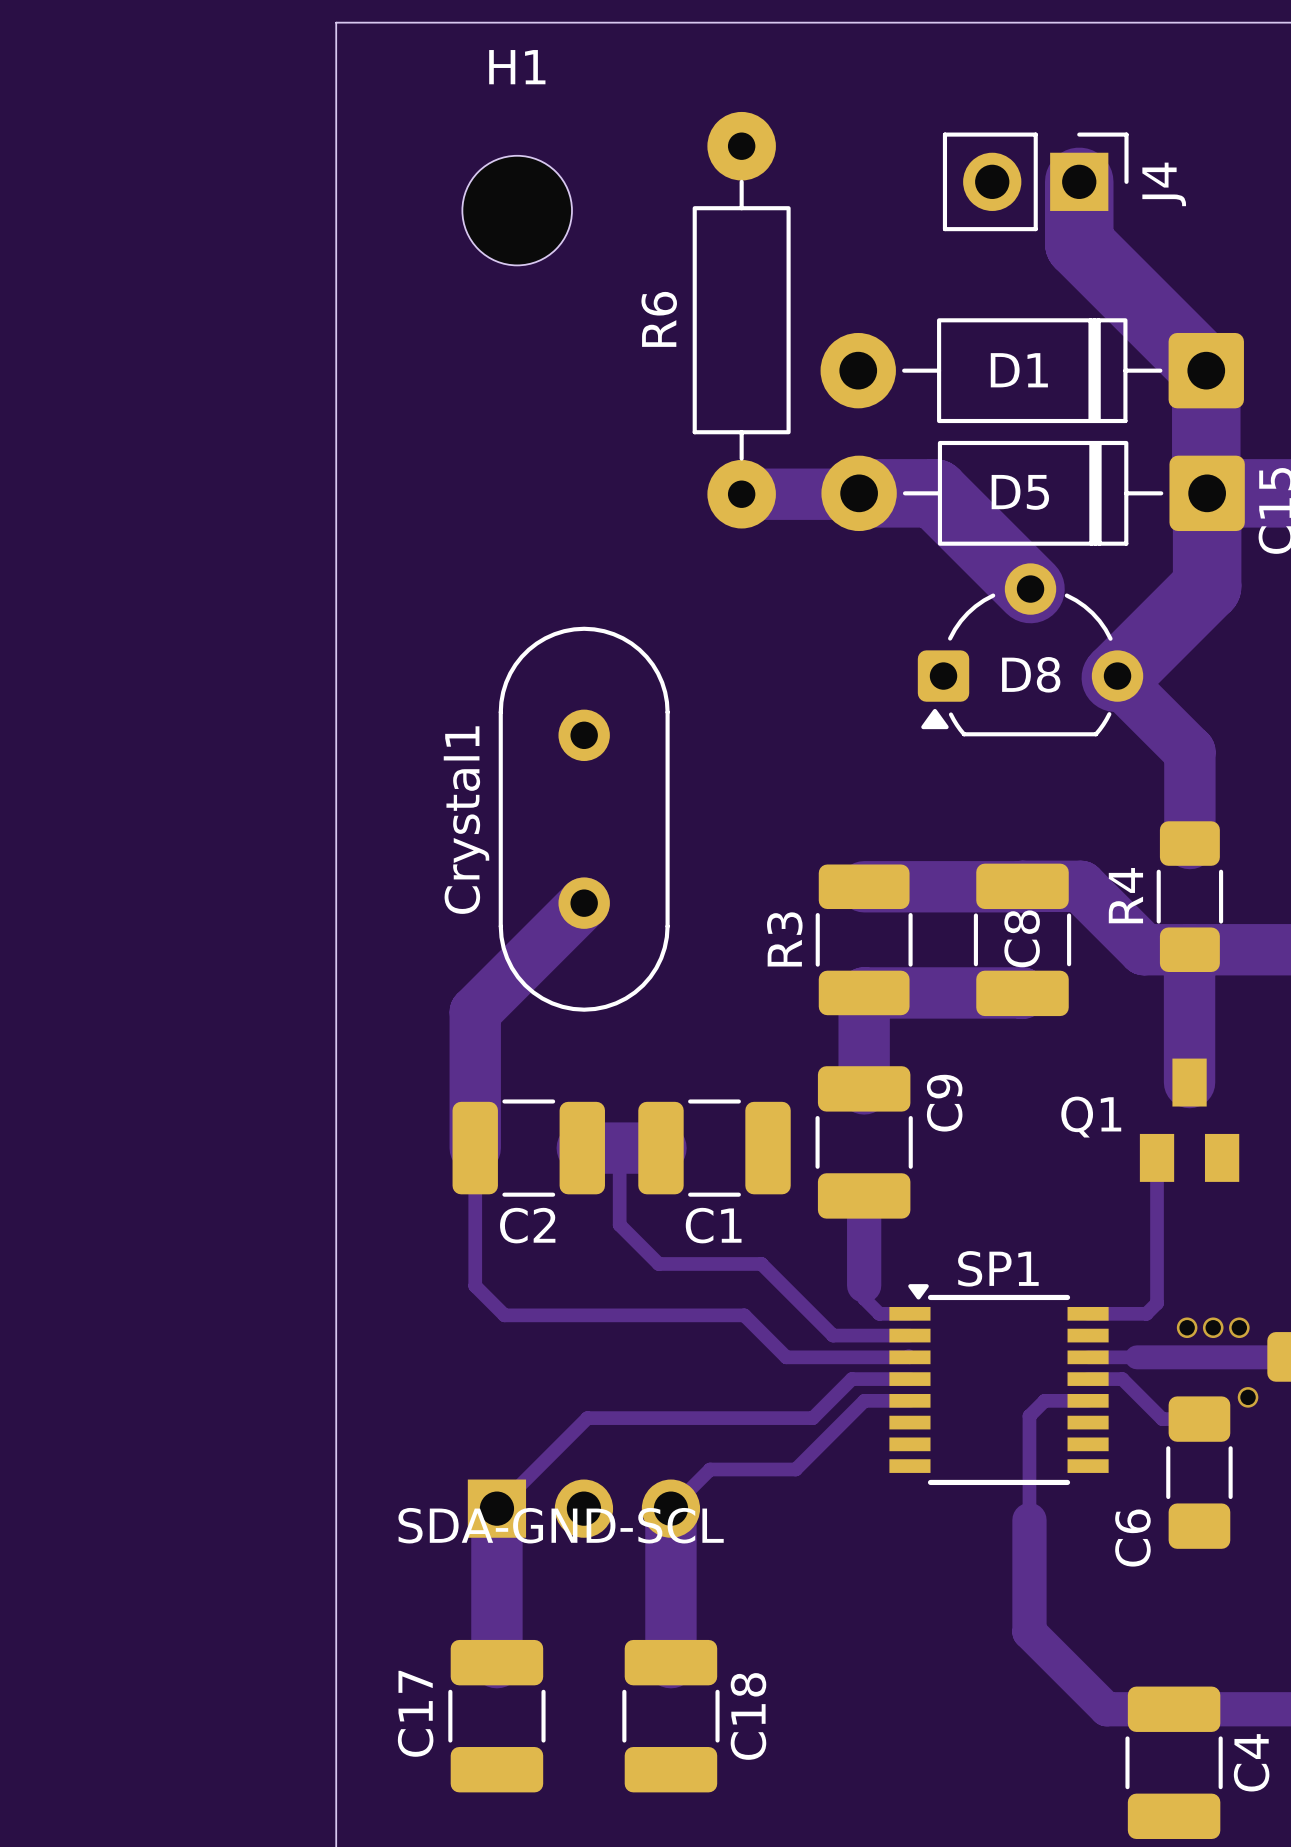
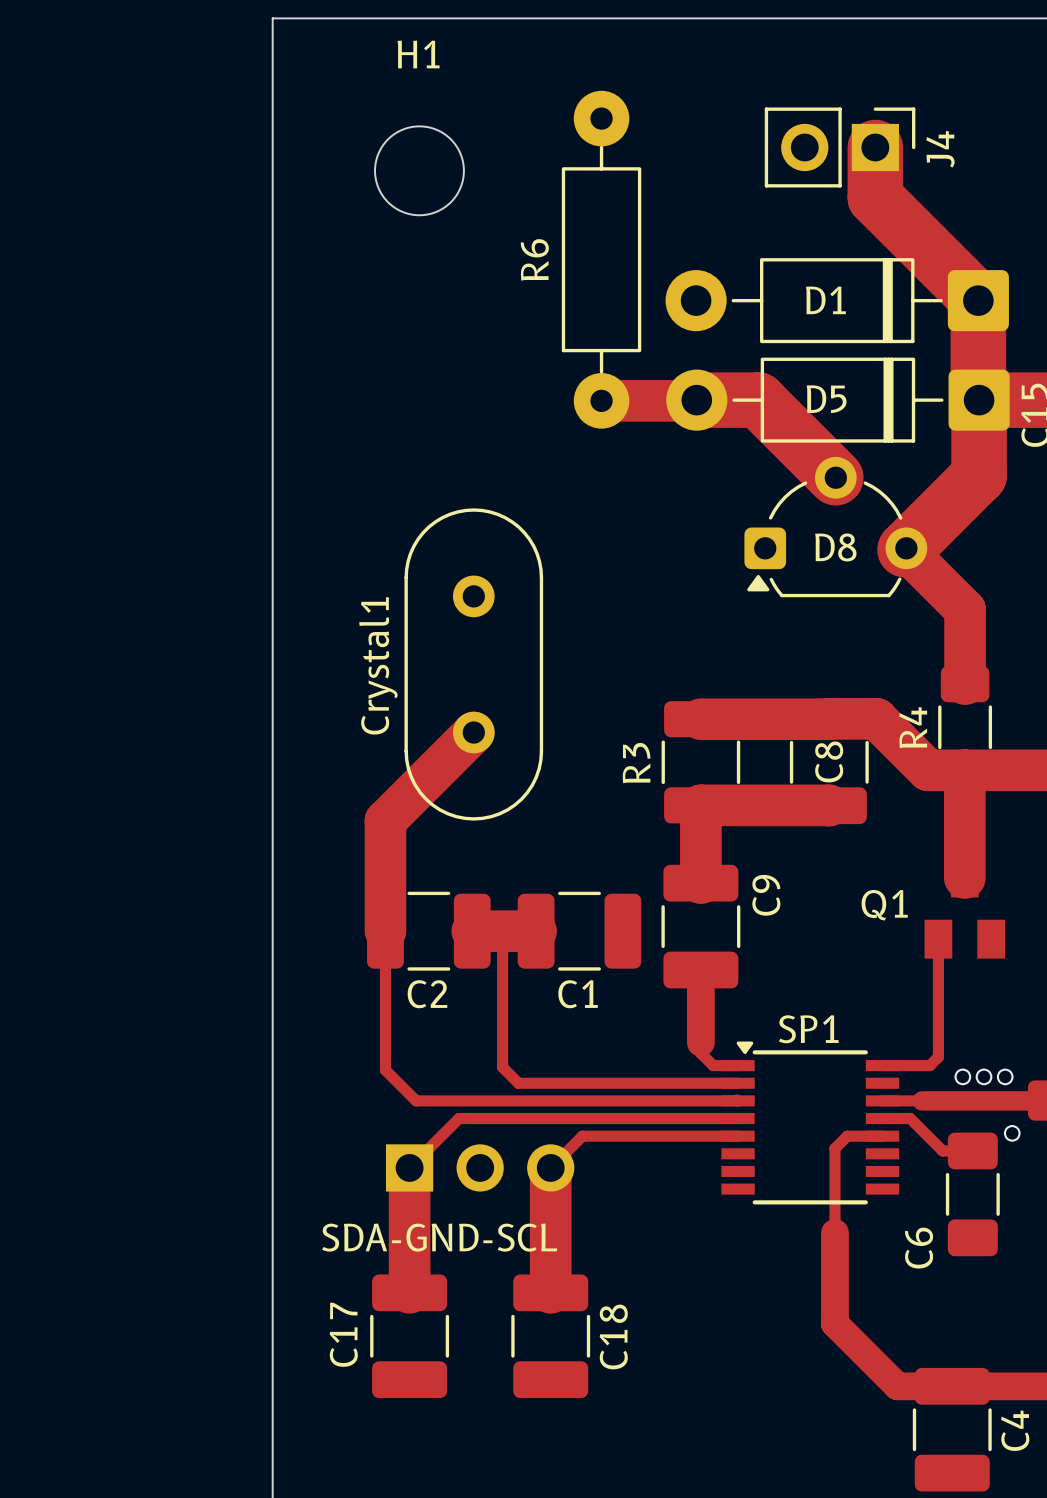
track: (619, 1224) (658, 1263) (761, 1263) (833, 1335) -> (502, 993) (502, 1067) (518, 1083) (675, 1083)
track: (475, 1286) (504, 1315) (744, 1315) (786, 1357) -> (385, 1043) (385, 1070) (416, 1100) (637, 1100)
track: (851, 1379) (812, 1418) (587, 1418) (496, 1508) (496, 1662) -> (690, 1118) (458, 1118) (409, 1167) (409, 1292)
track: (864, 1400) (795, 1469) (710, 1469) (670, 1508) (670, 1662) -> (701, 1136) (582, 1136) (550, 1167) (550, 1292)
part position: (583, 1508) -> (480, 1167)
C17 position: (496, 1716) -> (409, 1336)
C18 position: (670, 1716) -> (550, 1336)

